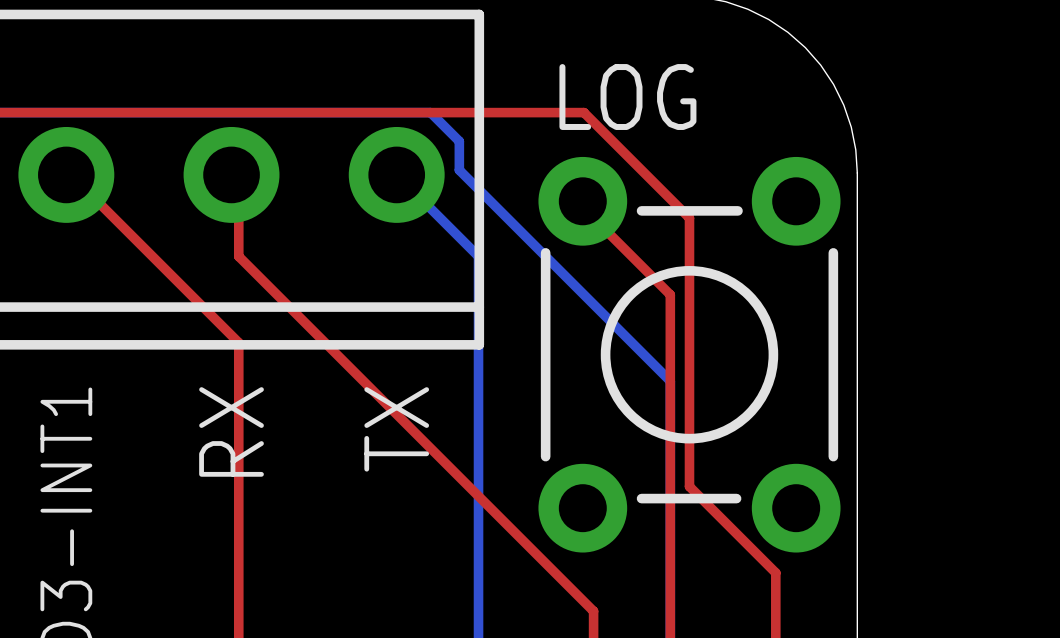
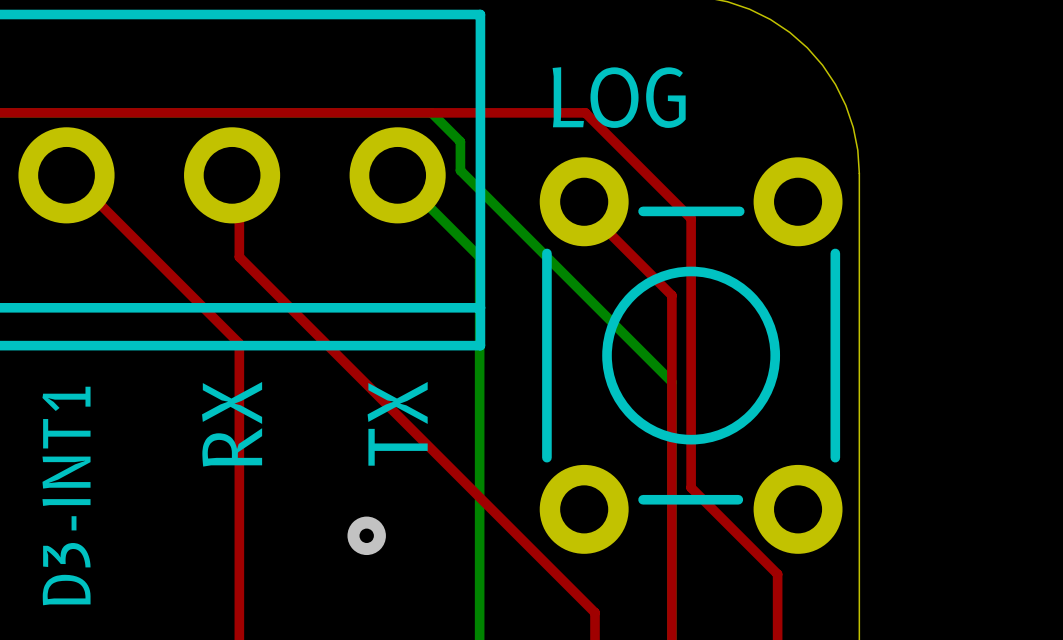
via: none -> (366, 535)

